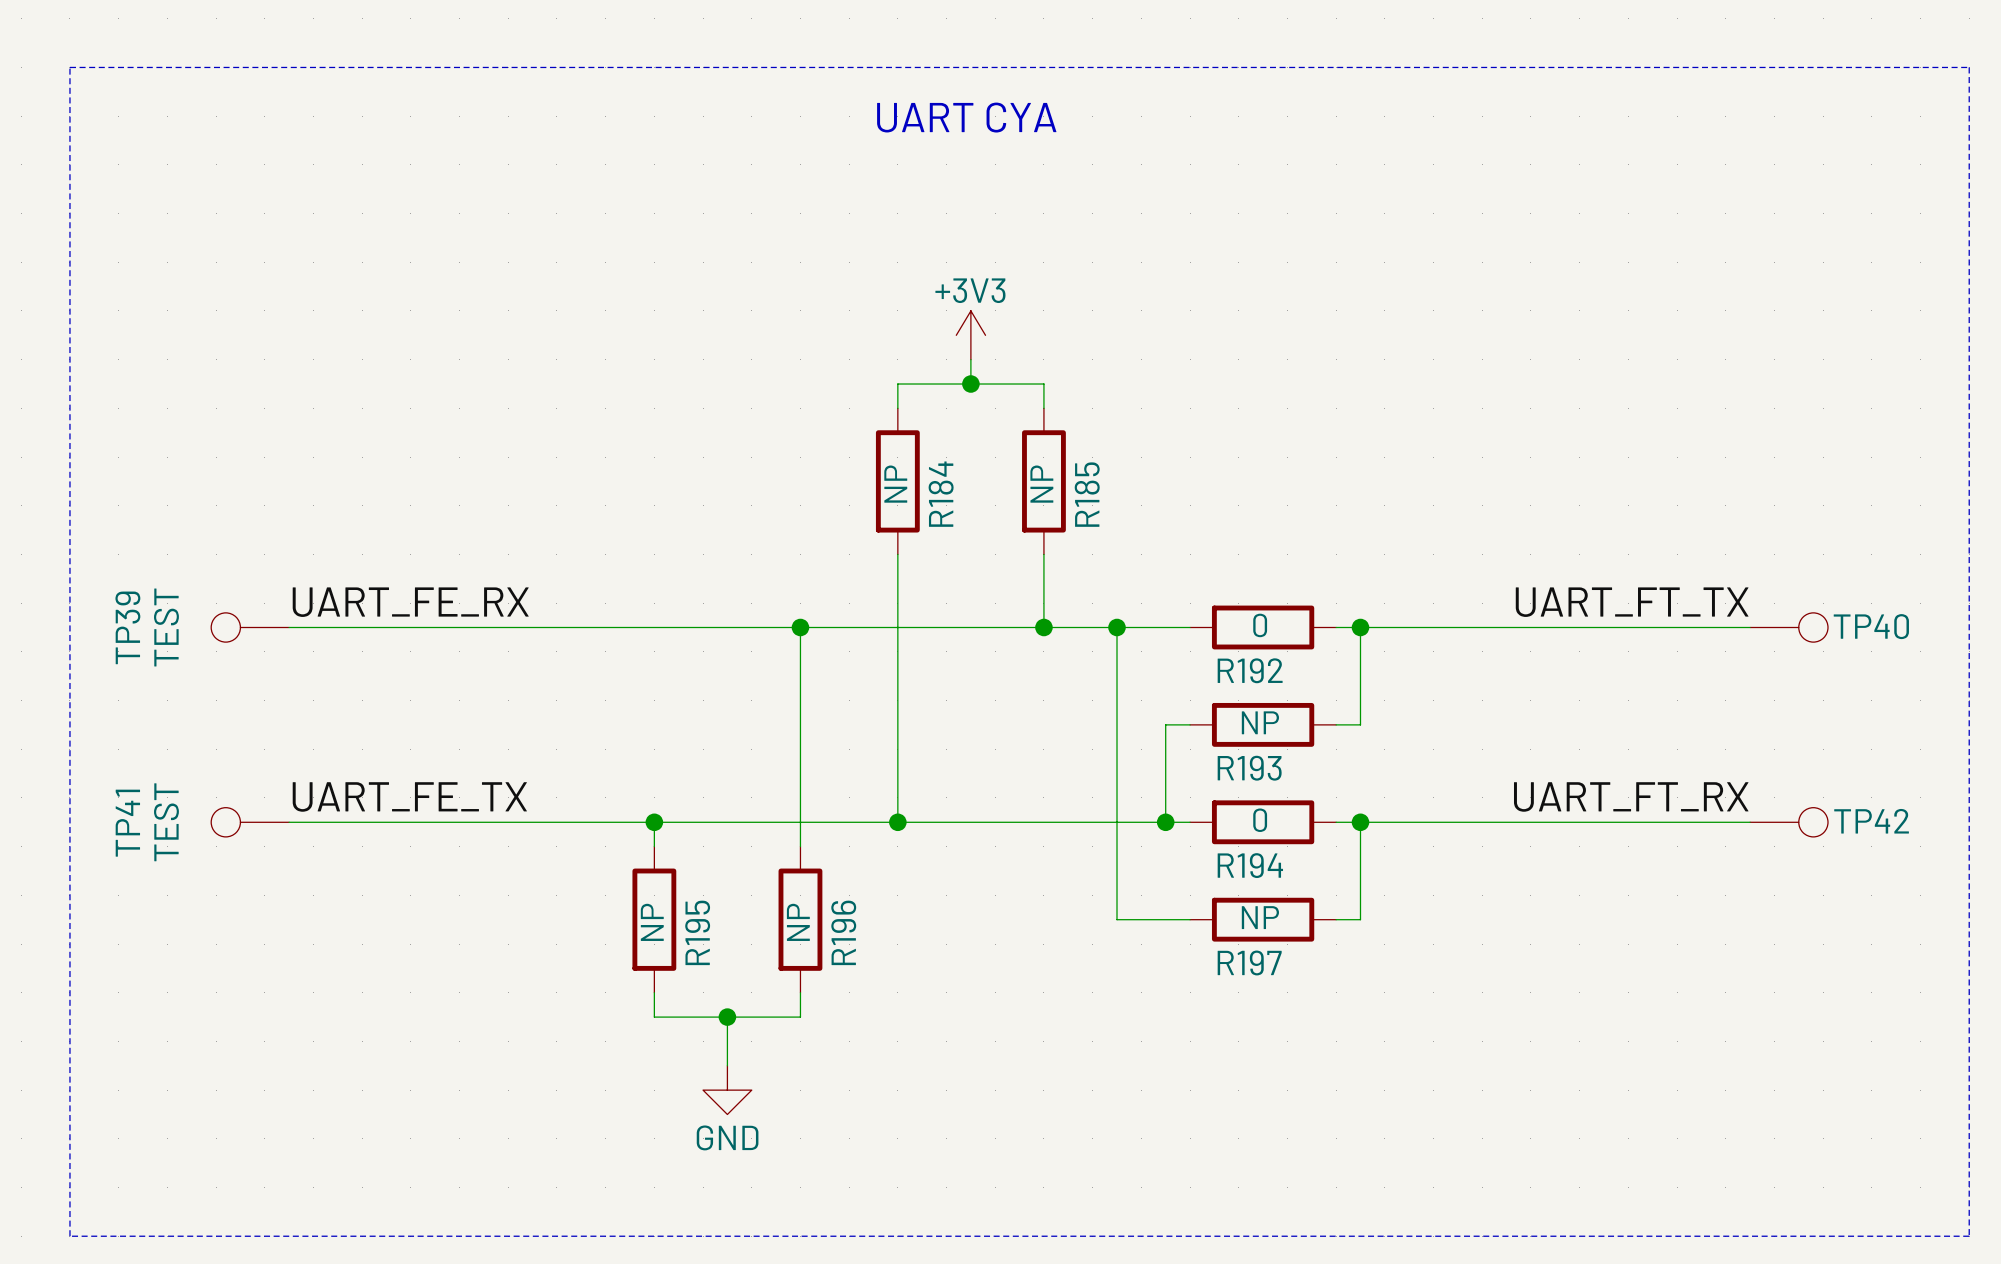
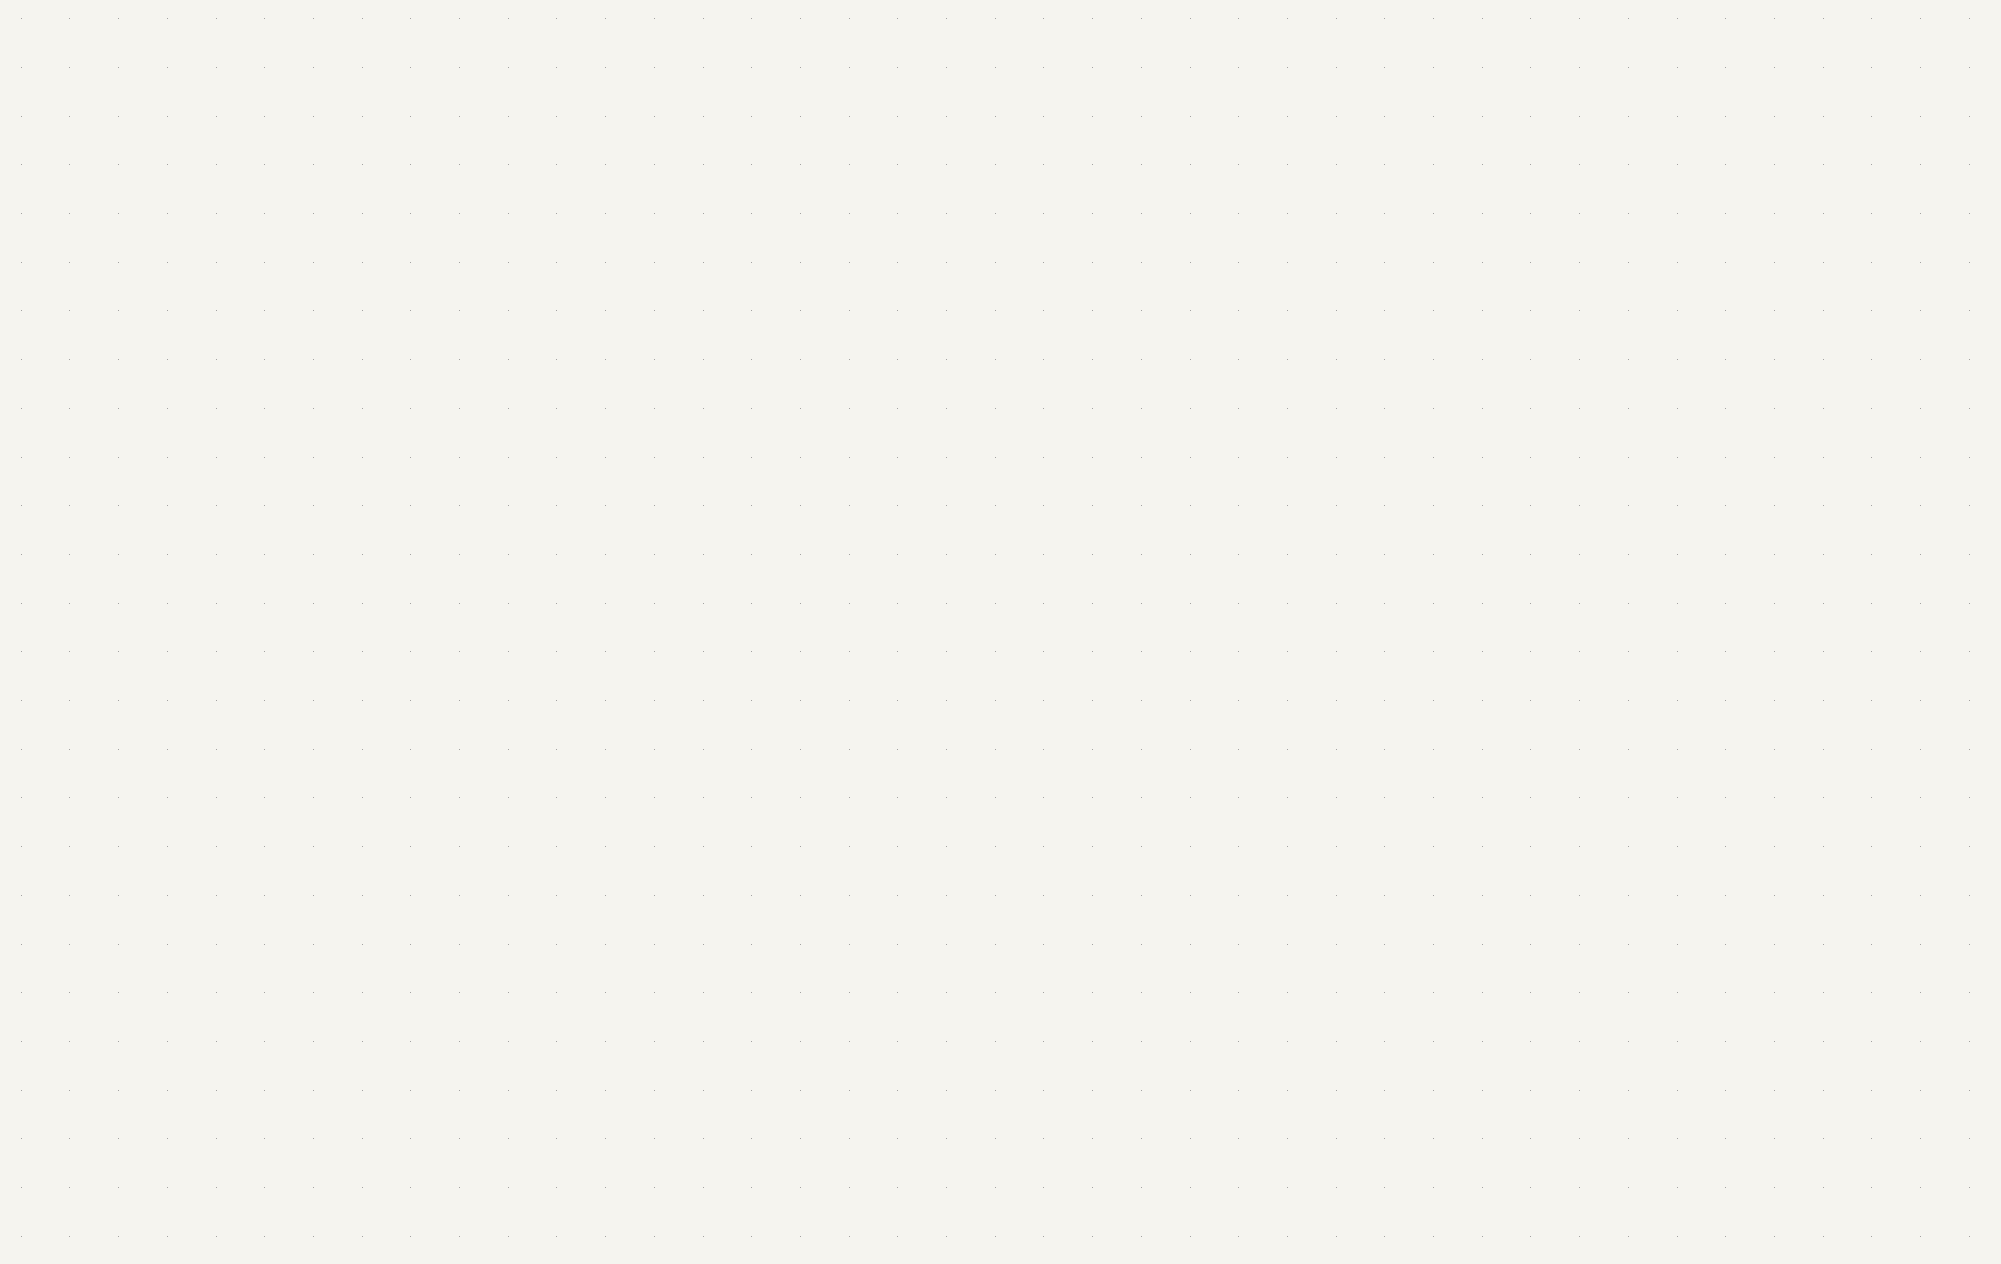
line: (69, 67) (1969, 67) (1969, 1236) (69, 1236) (69, 67) -> none
text: UART CYA (966, 117) -> none
power symbol: +3V3 (970, 335) -> none
wire: (970, 359) (970, 384) -> none
junction: (970, 384) -> none
wire: (897, 408) (897, 384) (1043, 384) (1043, 408) -> none
R184: (897, 481) -> none
R185: (1043, 481) -> none
wire: (897, 554) (897, 822) -> none
wire: (1043, 554) (1043, 627) -> none
label: UART_FE_RX (410, 602) -> none
label: UART_FT_TX (1632, 602) -> none
TP39: TEST (250, 627) -> none
wire: (289, 627) (1190, 627) -> none
wire: (800, 627) (800, 846) -> none
junction: (800, 627) -> none
junction: (1043, 627) -> none
wire: (1117, 627) (1117, 919) (1190, 919) -> none
junction: (1117, 627) -> none
R192: (1263, 627) -> none
wire: (1336, 627) (1750, 627) -> none
wire: (1360, 627) (1360, 724) (1336, 724) -> none
junction: (1360, 627) -> none
TP40: (1789, 627) -> none
wire: (1190, 724) (1165, 724) (1165, 822) -> none
R193: (1263, 724) -> none
label: UART_FE_TX (409, 796) -> none
label: UART_FT_RX (1631, 796) -> none
TP41: TEST (250, 822) -> none
wire: (289, 822) (1190, 822) -> none
wire: (654, 822) (654, 846) -> none
junction: (654, 822) -> none
junction: (897, 822) -> none
junction: (1165, 822) -> none
R194: (1263, 822) -> none
wire: (1336, 822) (1750, 822) -> none
wire: (1360, 822) (1360, 919) (1336, 919) -> none
junction: (1360, 822) -> none
TP42: (1789, 822) -> none
R195: (654, 919) -> none
R196: (800, 919) -> none
R197: (1263, 919) -> none
wire: (654, 992) (654, 1017) (800, 1017) (800, 992) -> none
wire: (727, 1017) (727, 1065) -> none
junction: (727, 1017) -> none
power symbol: GND (727, 1090) -> none

